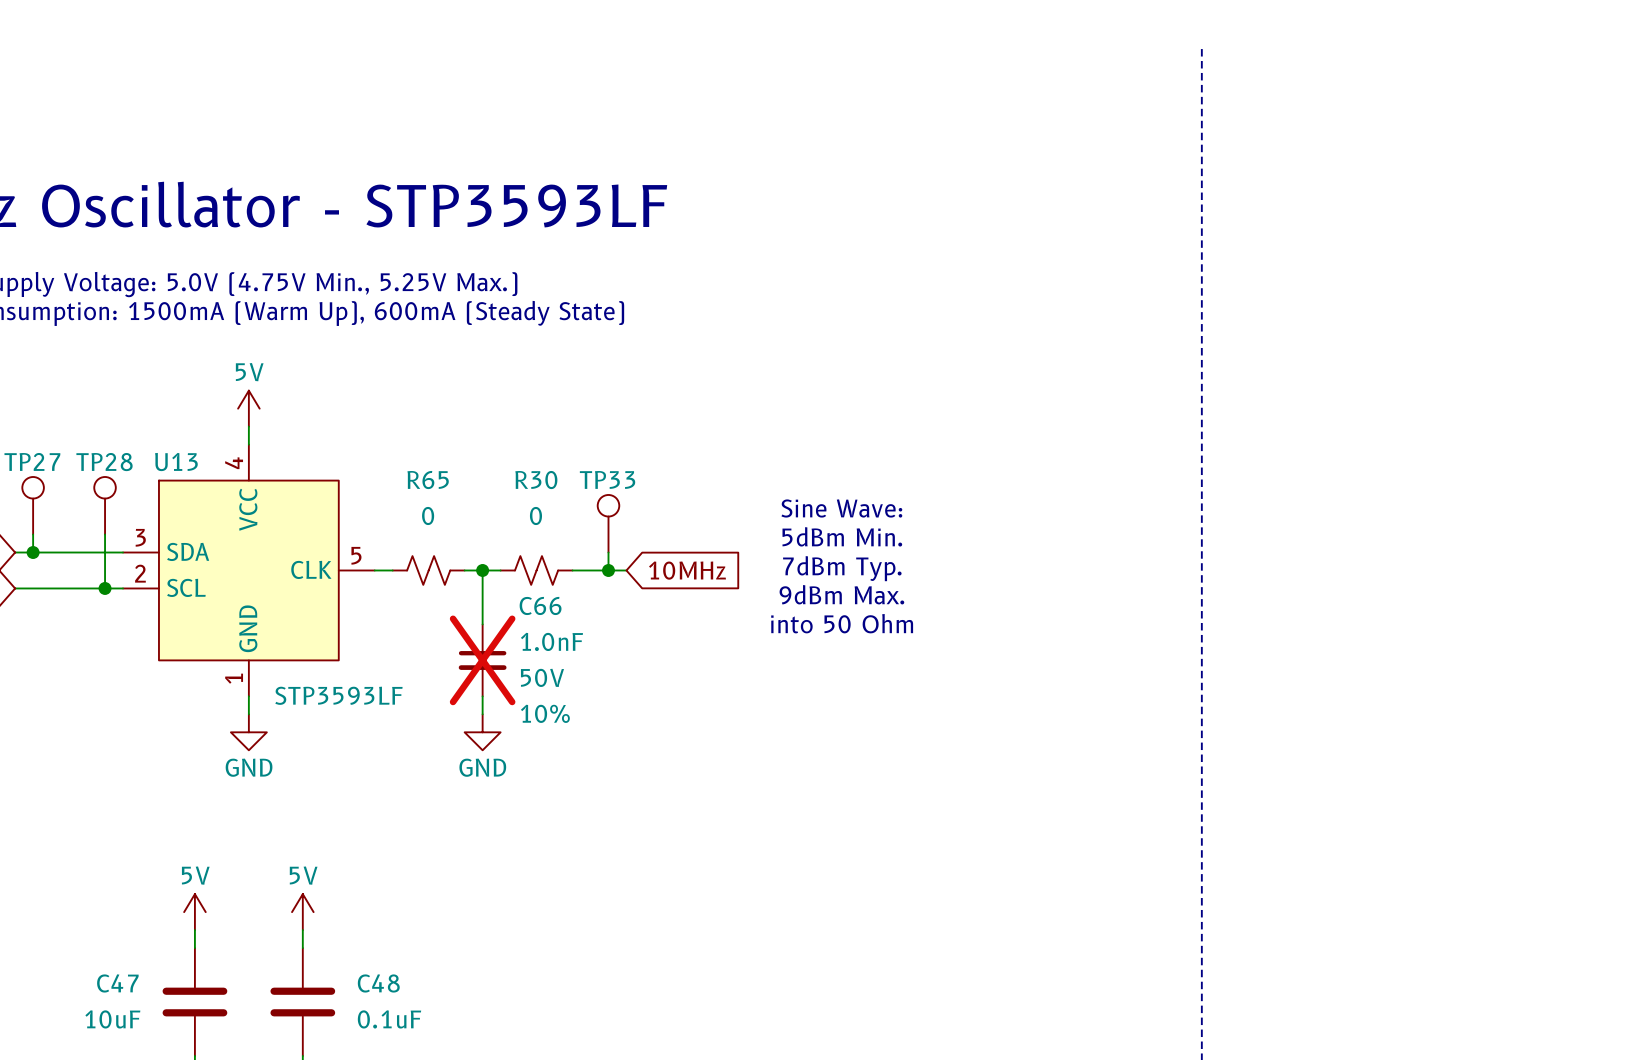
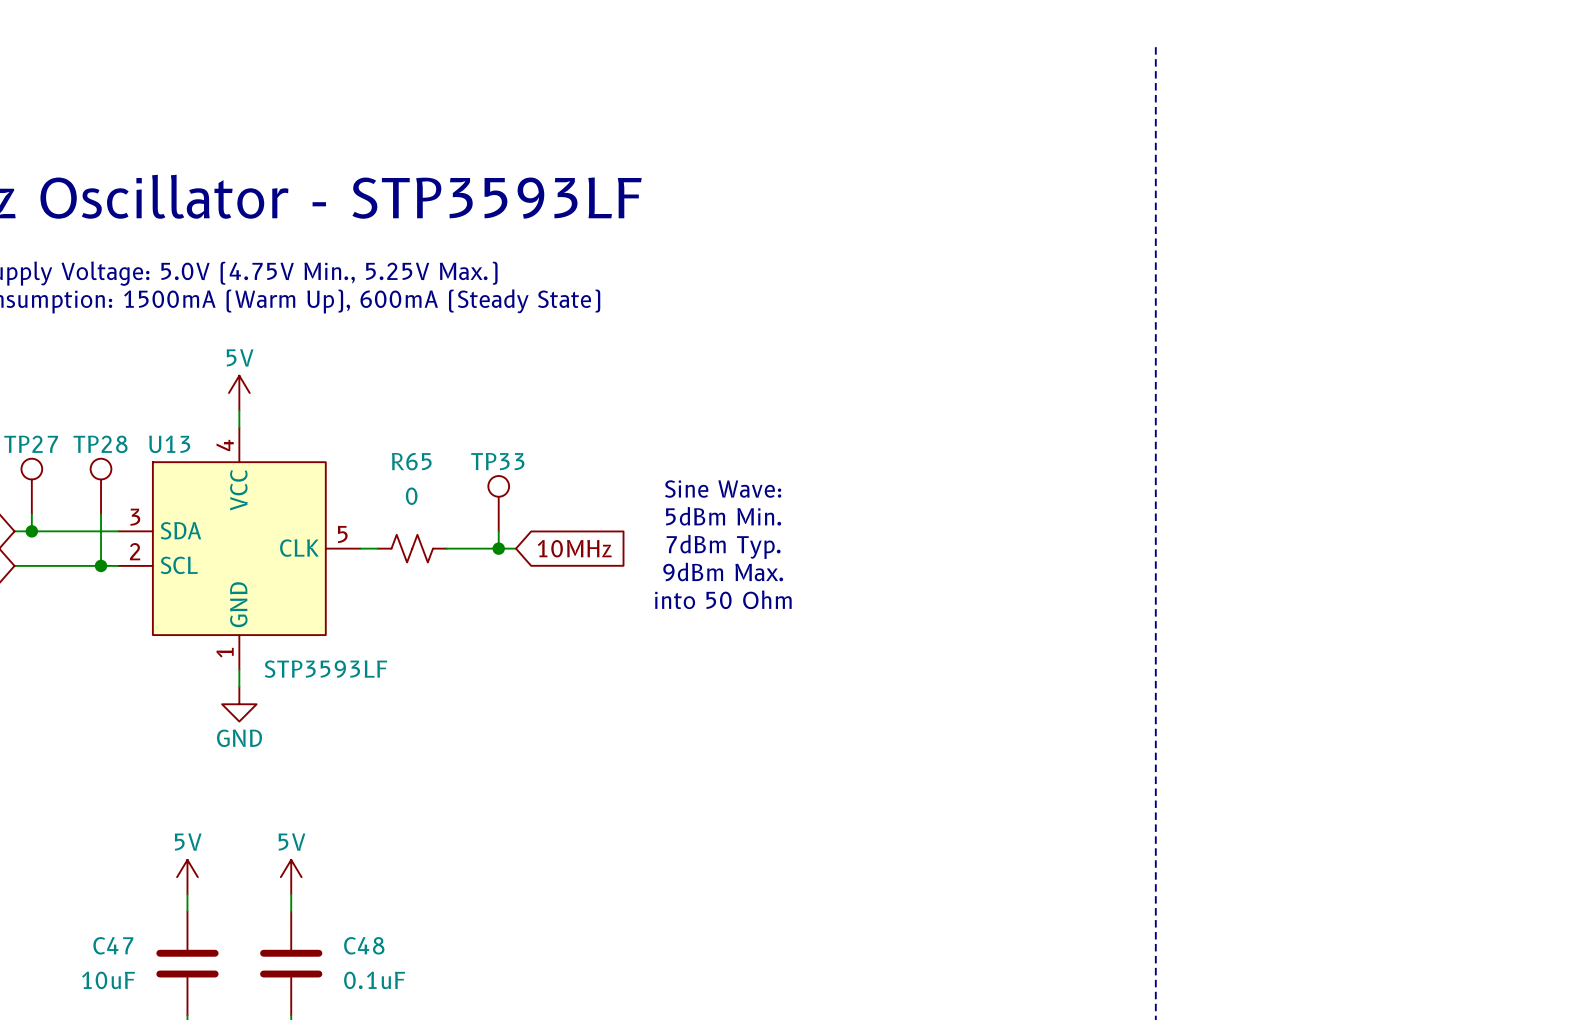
text position: Sine Wave: (841, 508) -> Sine Wave: (723, 489)
TP33 position: (608, 523) -> (498, 503)
text position: 5dBm Min. (842, 536) -> 5dBm Min. (723, 516)
wire: (608, 552) (608, 570) -> (498, 531) (498, 548)
text position: 7dBm Typ. (842, 568) -> 7dBm Typ. (723, 546)
wire: (482, 570) (482, 624) -> none
junction position: (482, 570) -> (498, 548)
R30: 0 (536, 570) -> none
wire: (572, 570) (626, 570) -> none
junction: (608, 570) -> none
global label position: 10MHz (687, 570) -> 10MHz (574, 548)
text position: 9dBm Max. (841, 594) -> 9dBm Max. (723, 571)
text position: into 50 Ohm (842, 623) -> into 50 Ohm (723, 599)
C66: 1.0nF (482, 660) -> none
wire: (482, 696) (482, 714) -> none
power symbol: GND (482, 732) -> none

